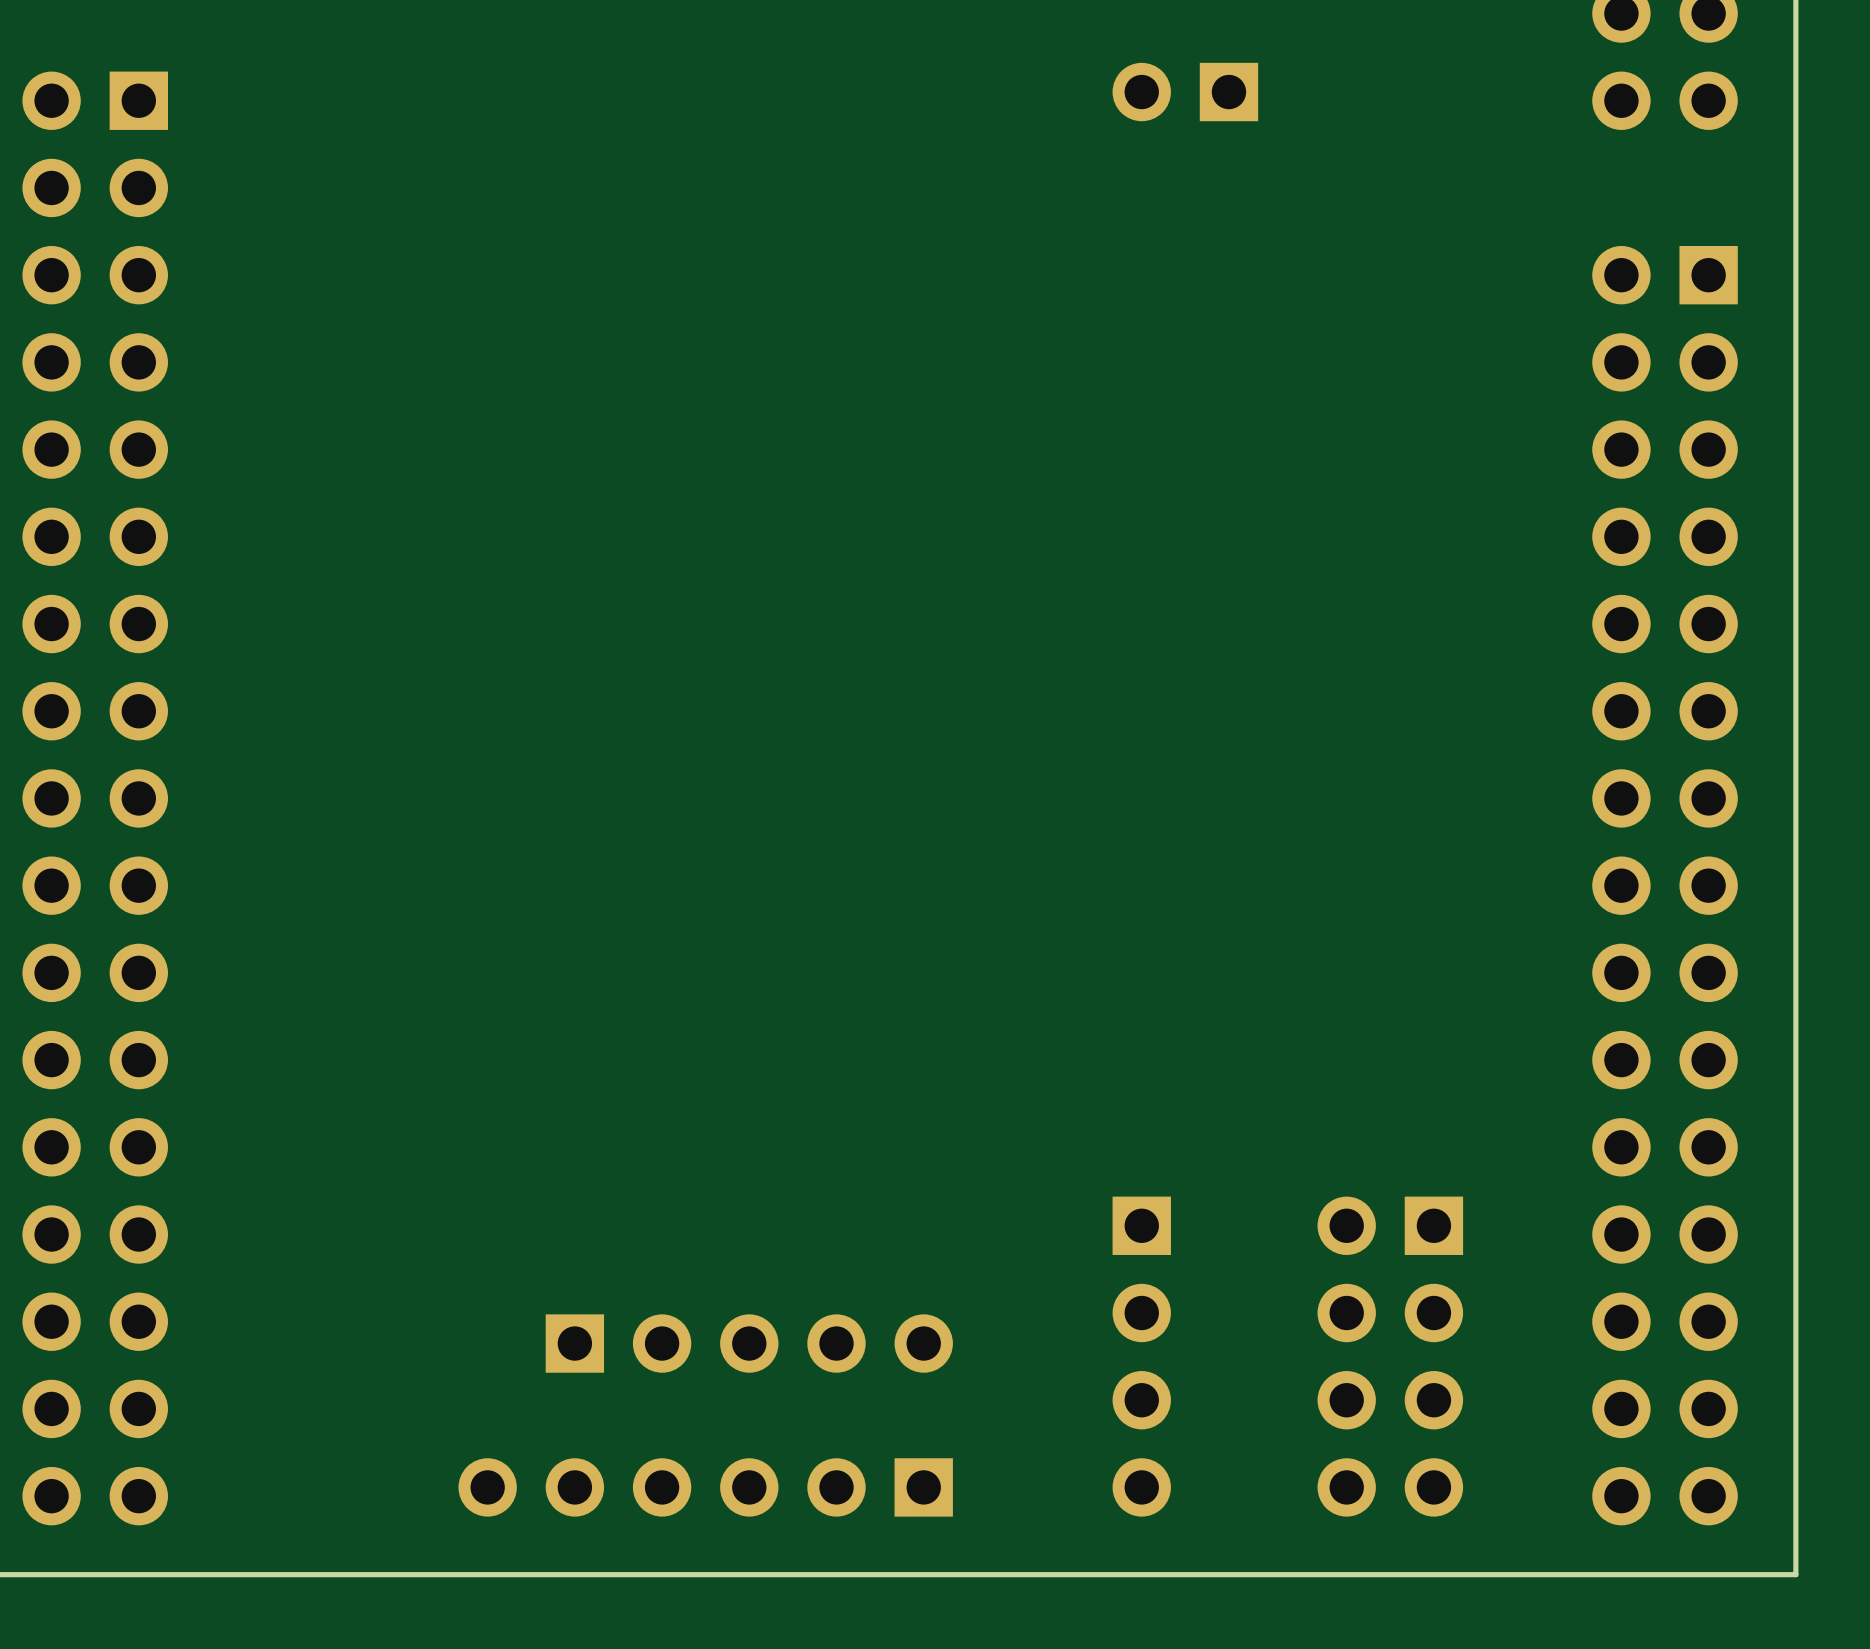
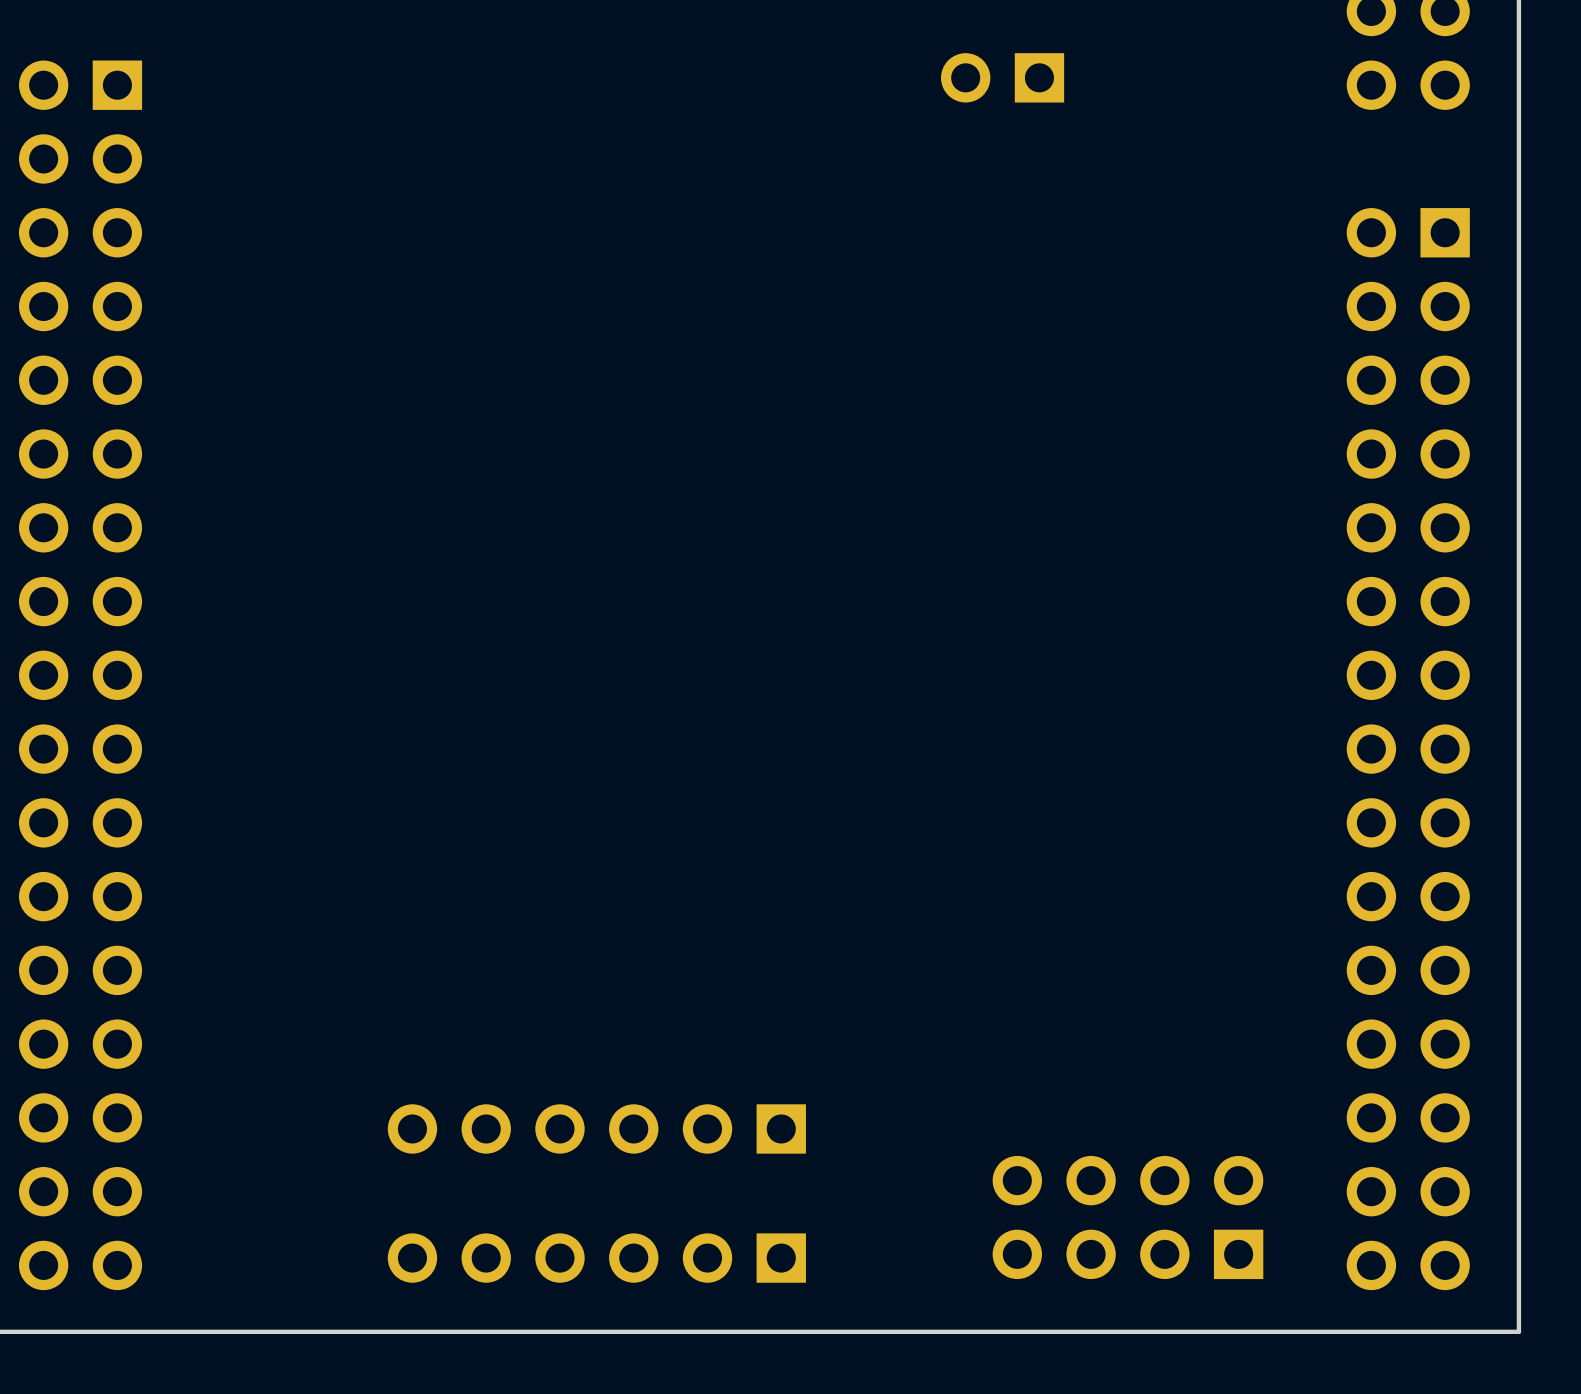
part: none -> (596, 1128)
part: (749, 1343) -> none
part: (1141, 1356) -> none
part rotation: 0° (1390, 1356) -> 90° clockwise (1127, 1217)

